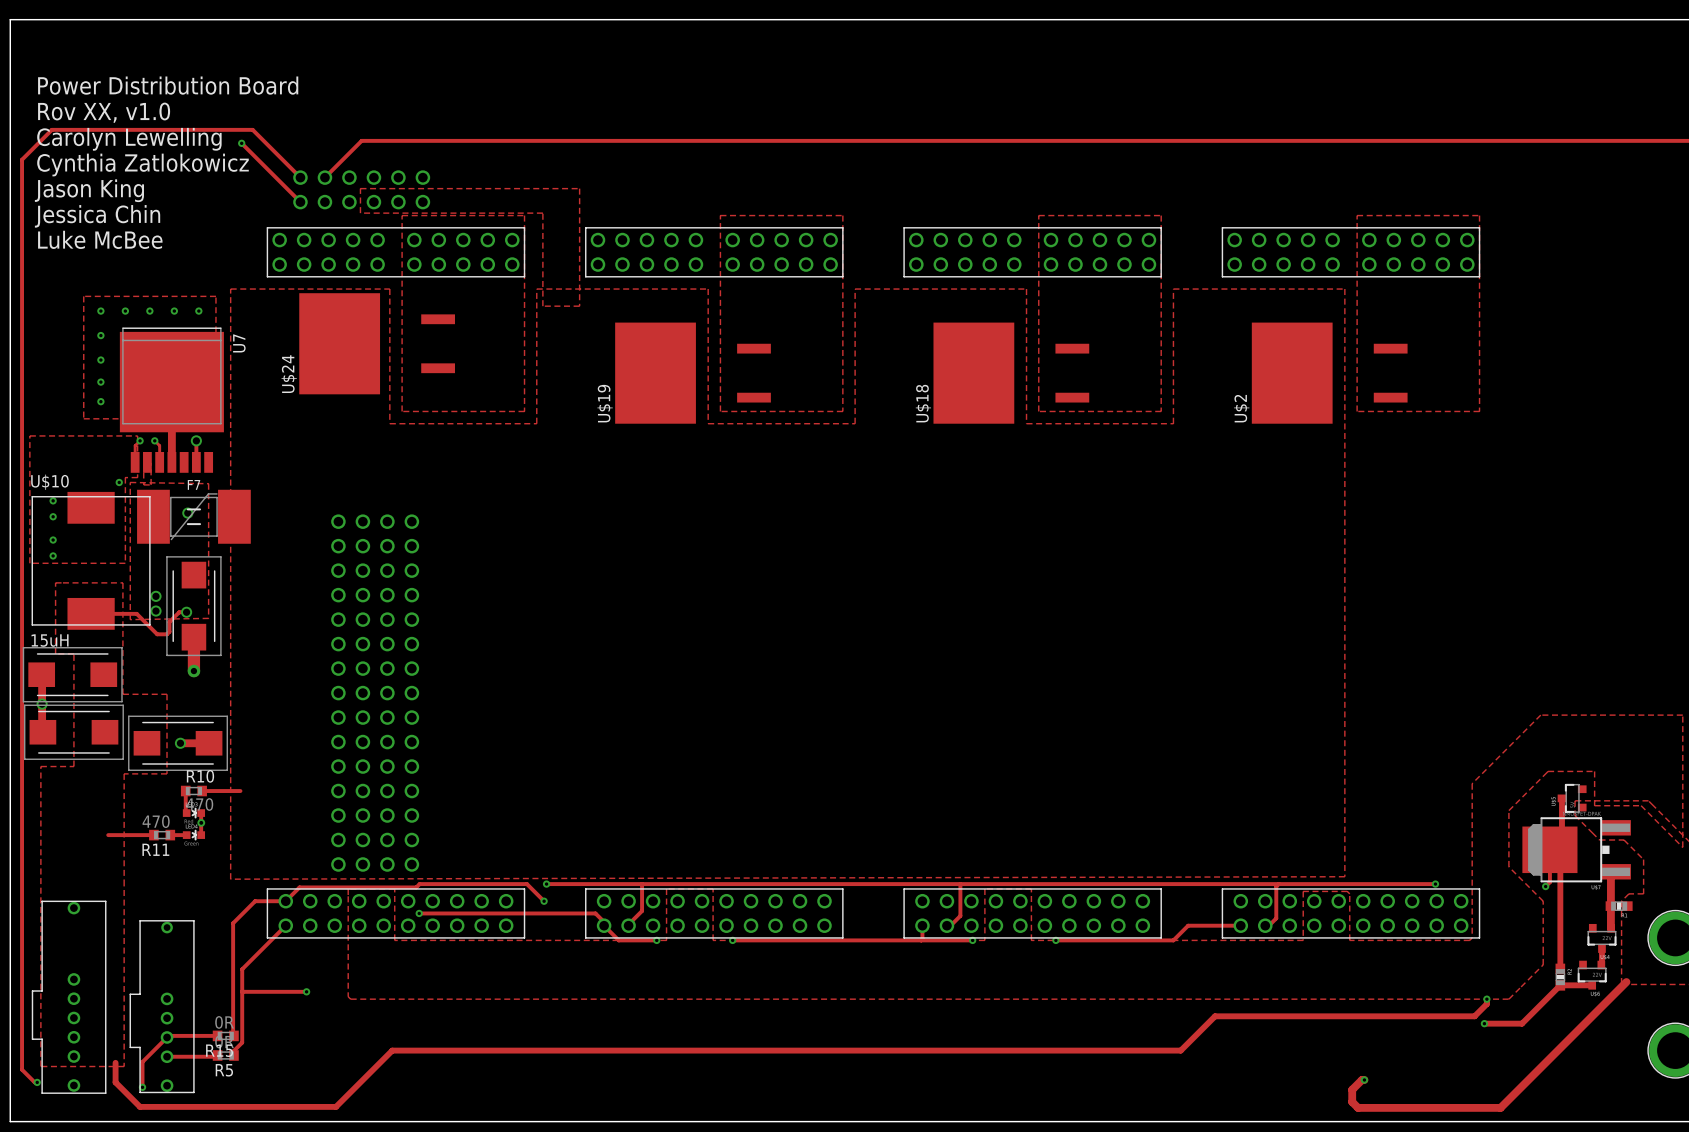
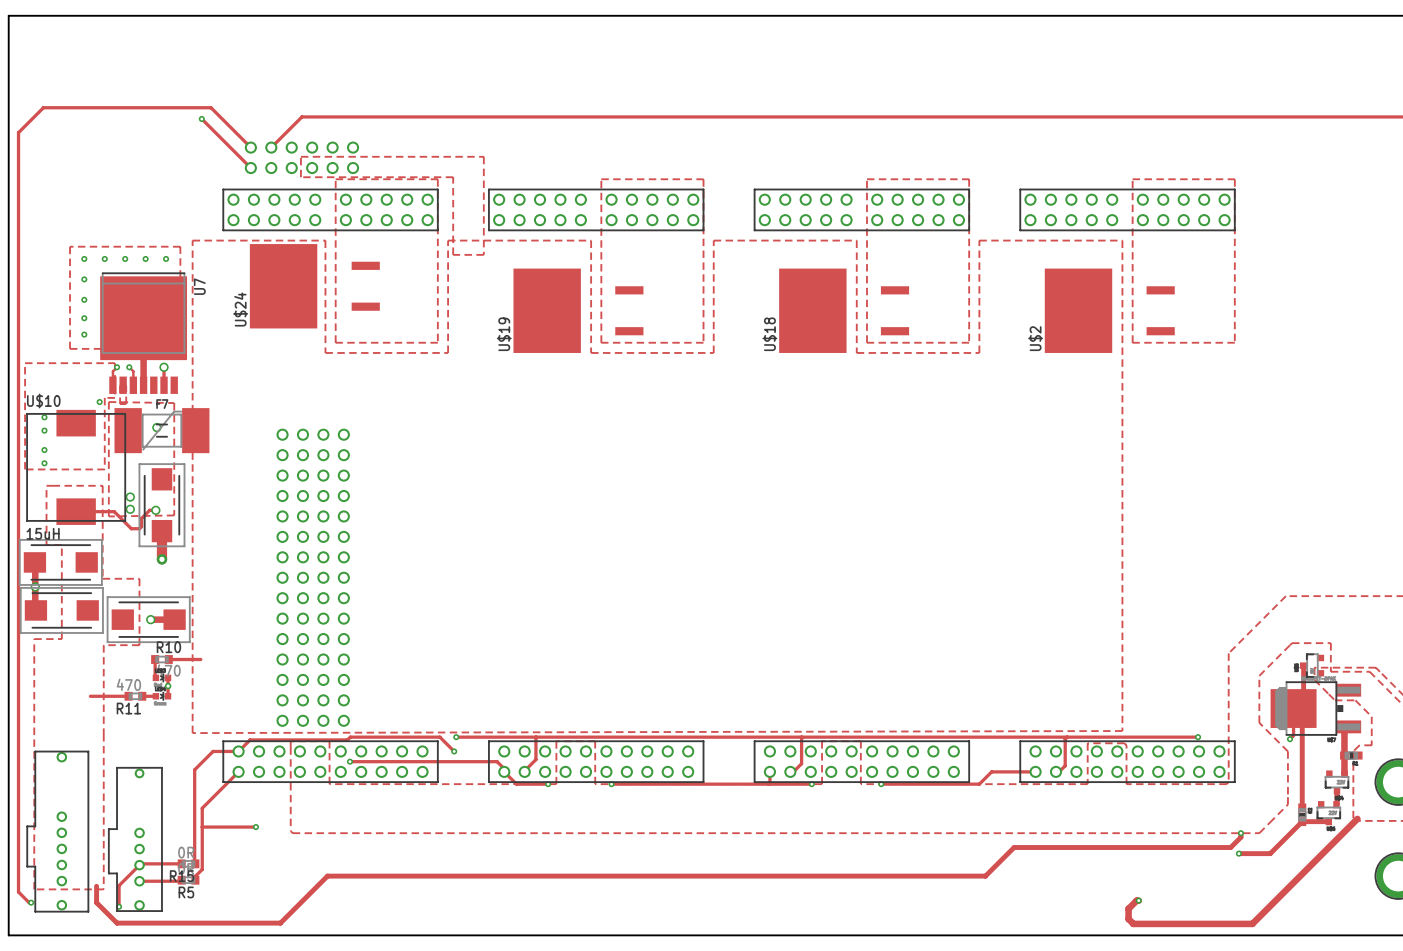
text: Power Distribution Board (168, 85) -> none
text: Rov XX, v1.0 (104, 112) -> none
text: Carolyn Lewelling (129, 139) -> none
text: Cynthia Zatlokowicz (142, 165) -> none
text: Jason King (89, 190) -> none
text: Jessica Chin (97, 216) -> none
text: Luke McBee (100, 239) -> none

